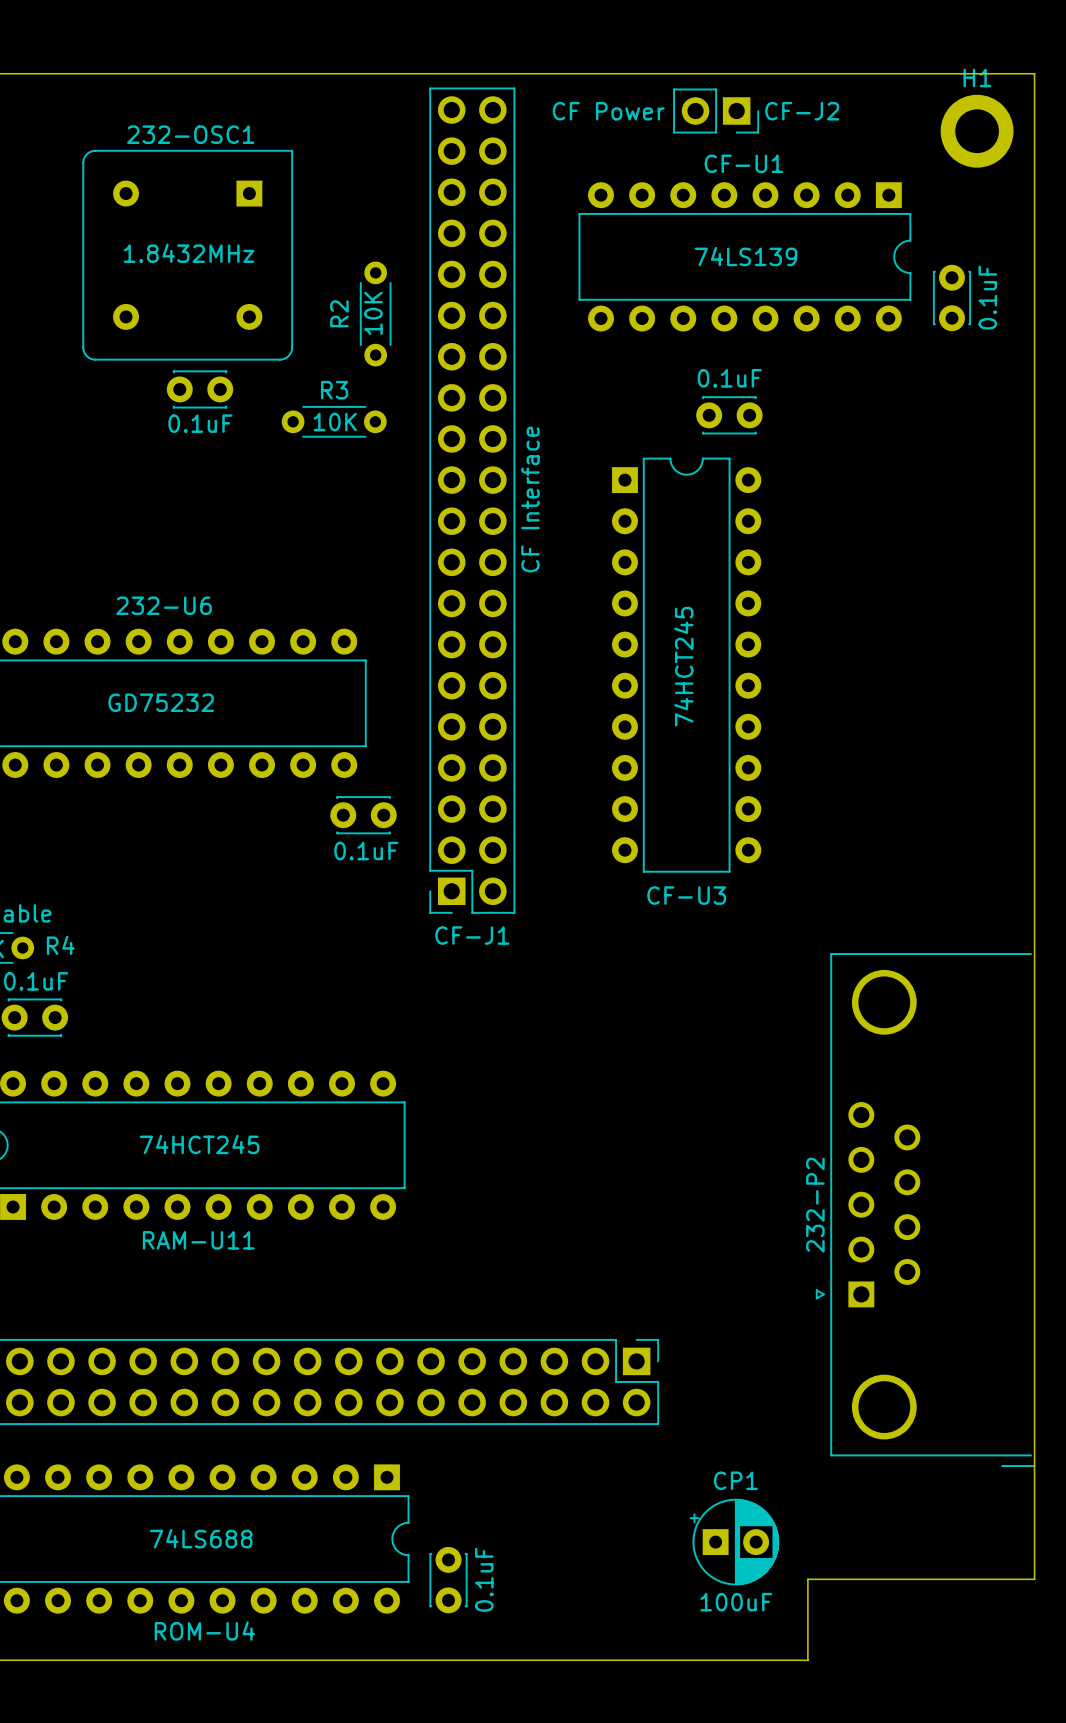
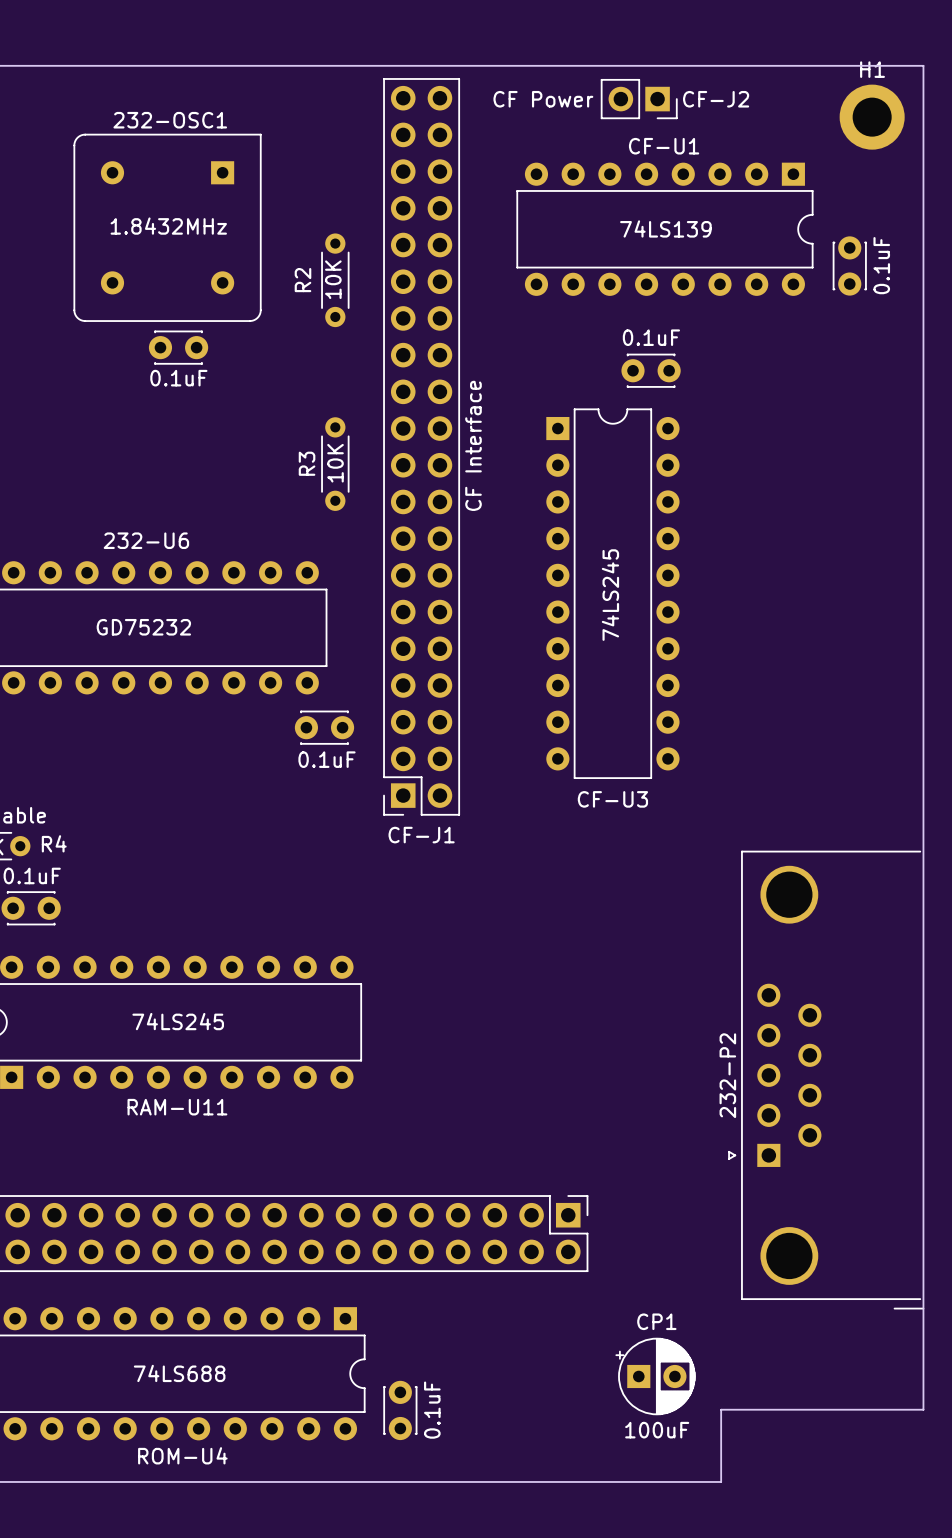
R3 name position: R3 (334, 390) -> R3 (307, 463)
R3 rotation: 0° (334, 421) -> 90° clockwise (335, 464)
R3 position: (334, 421) -> (335, 464)
CF-U3 value: 74HCT245 (683, 666) -> 74LS245 (610, 595)
RAM-U11 value: 74HCT245 (199, 1144) -> 74LS245 (178, 1021)

